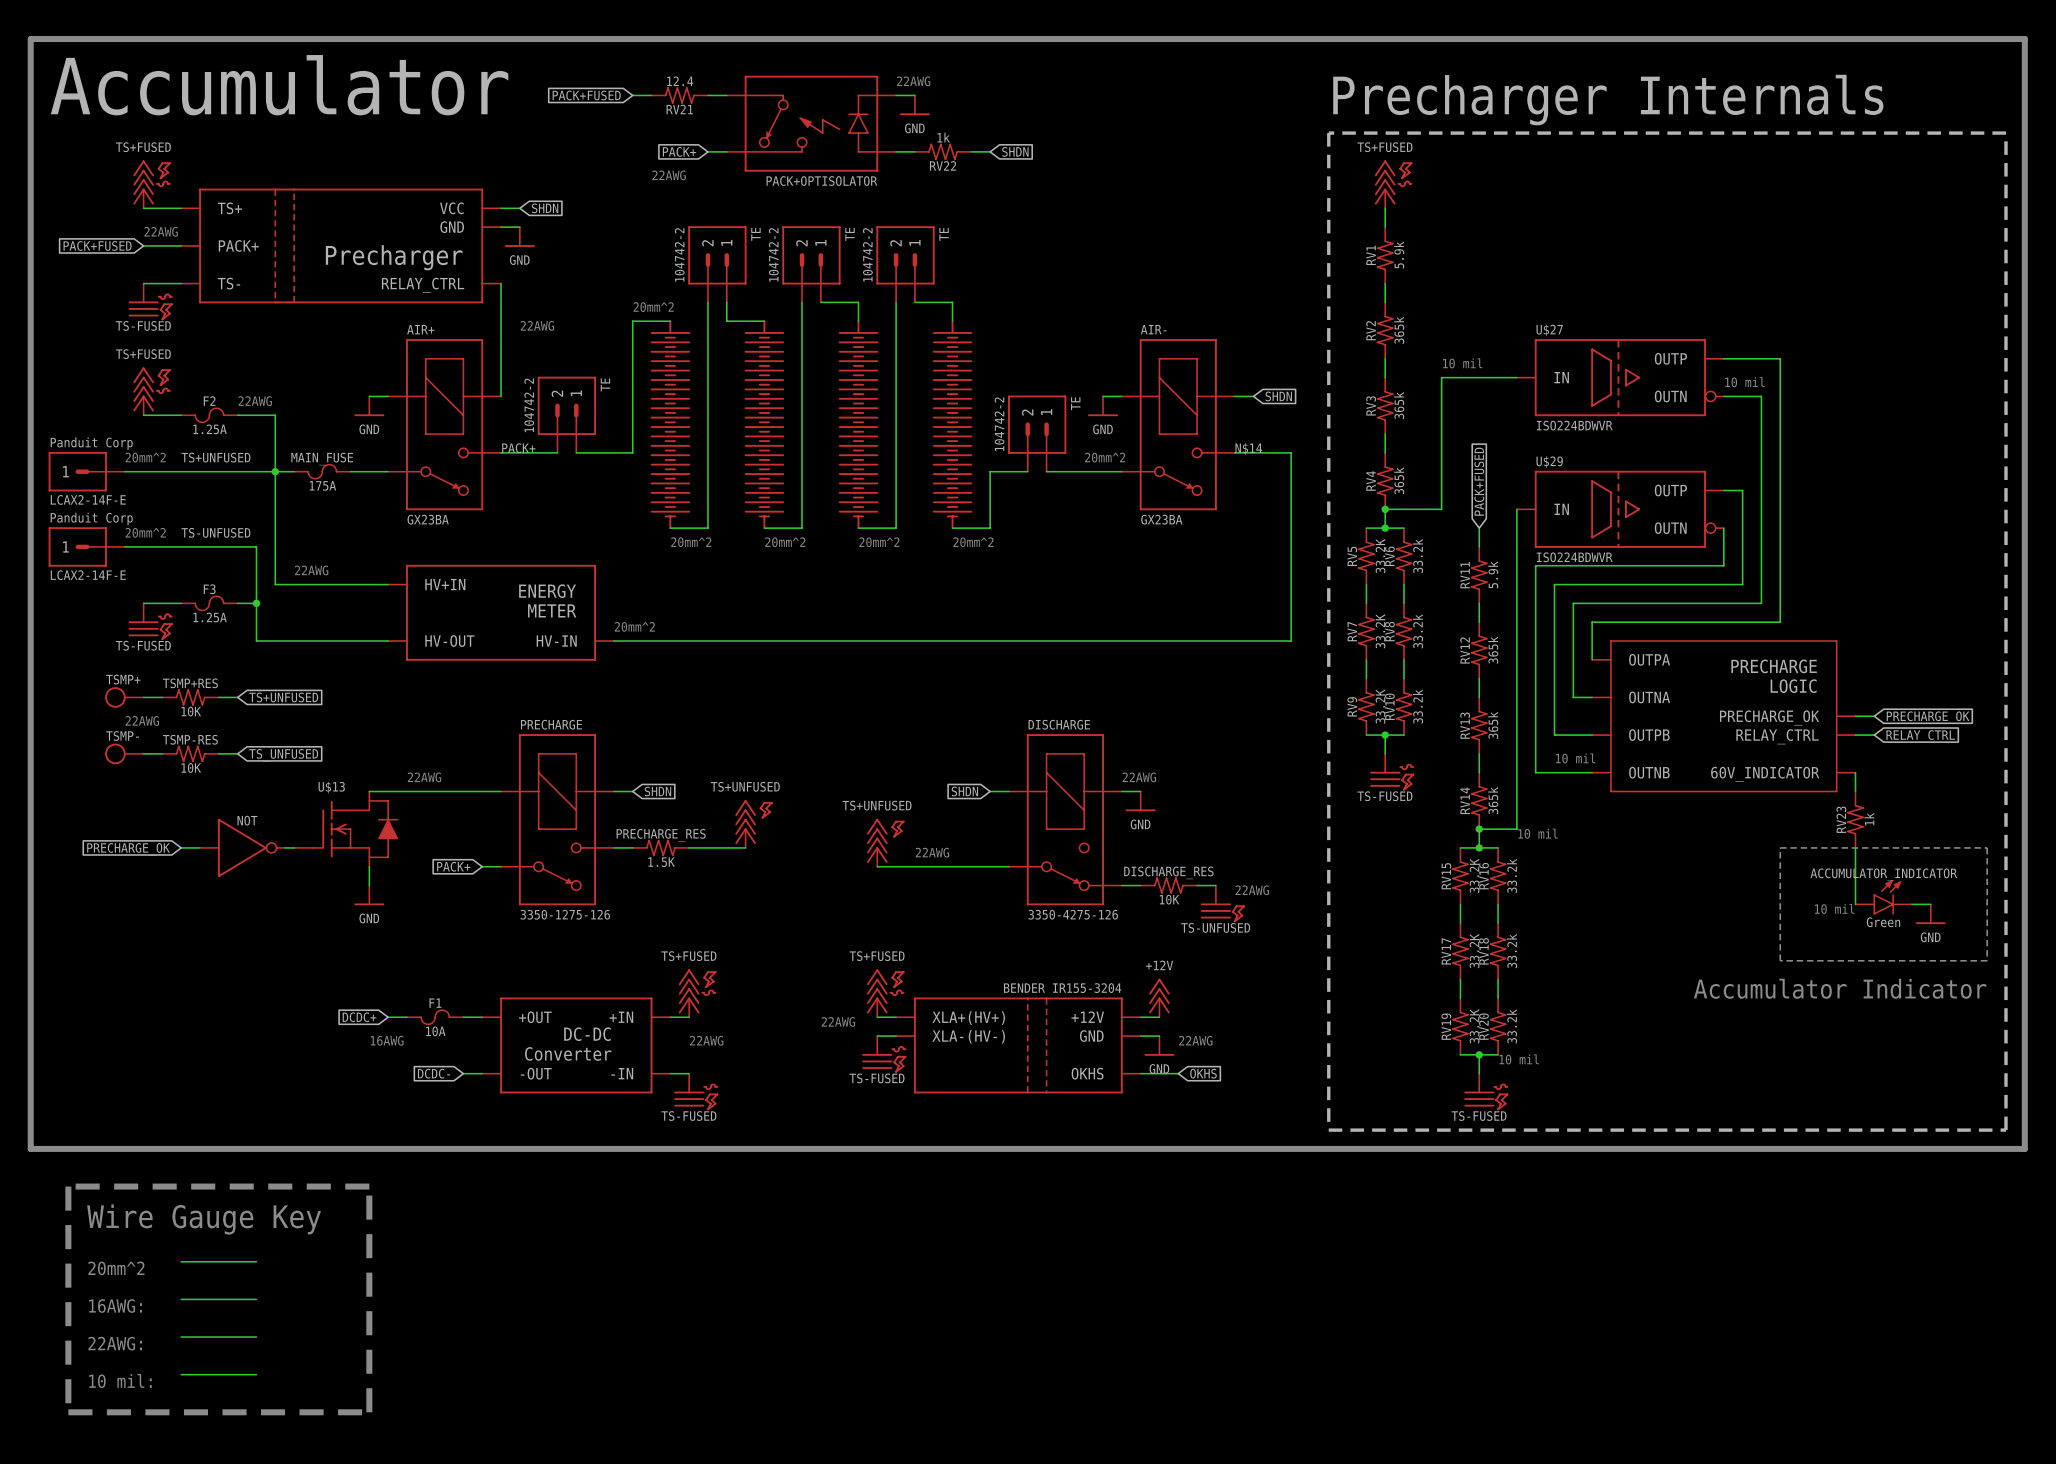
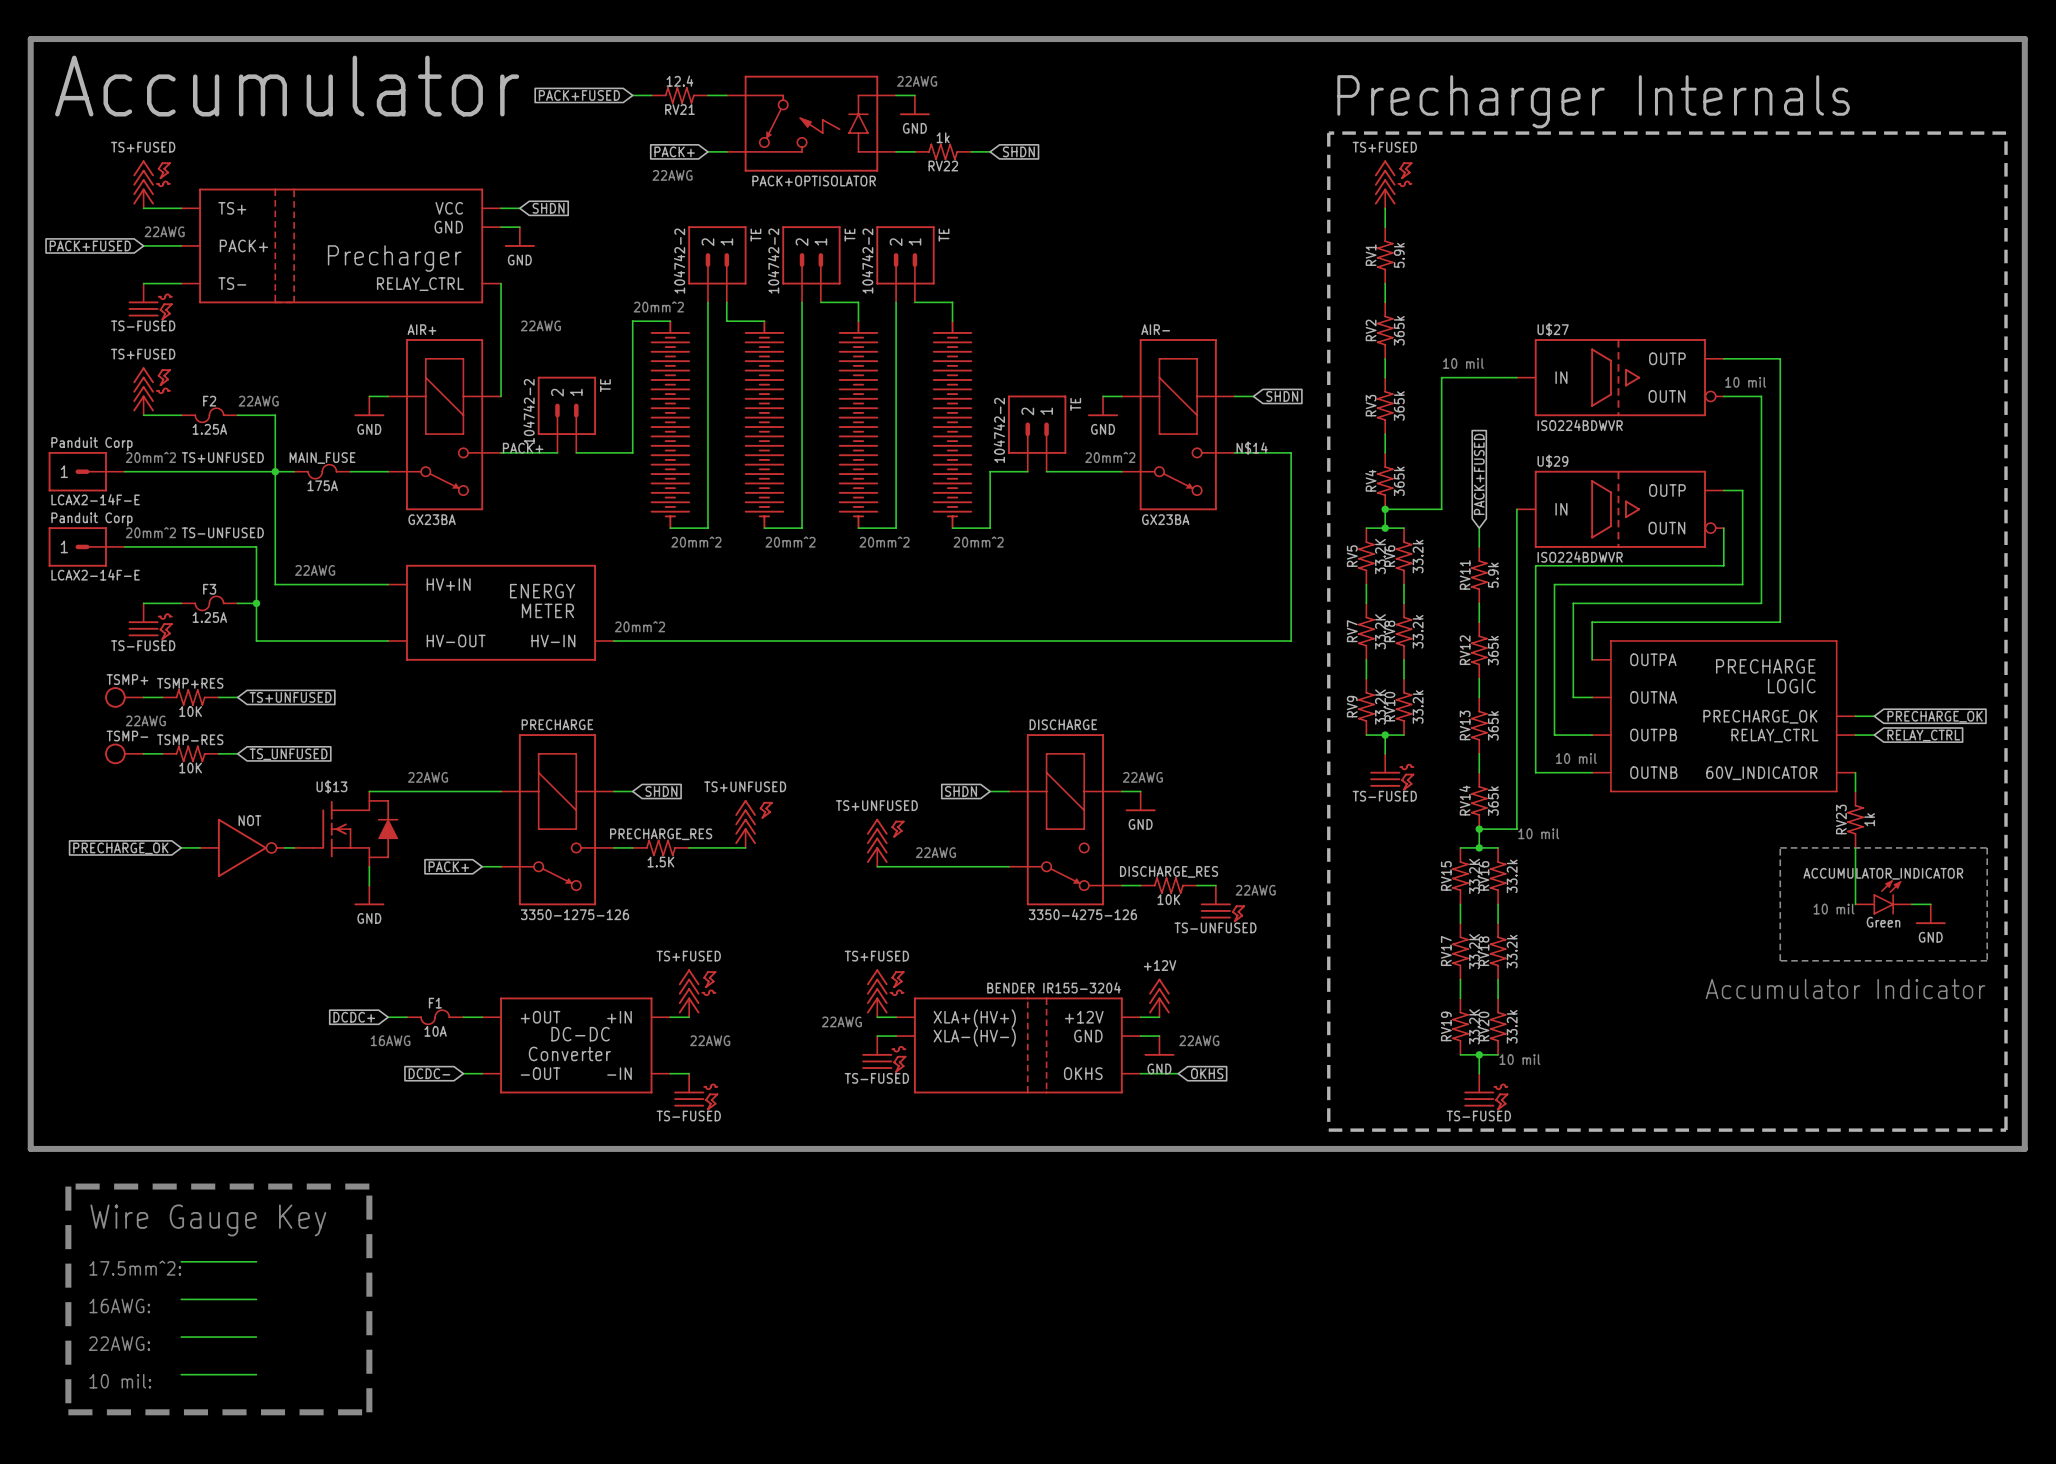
text: 20mm^2 (116, 1268) -> 17.5mm^2: (135, 1268)

